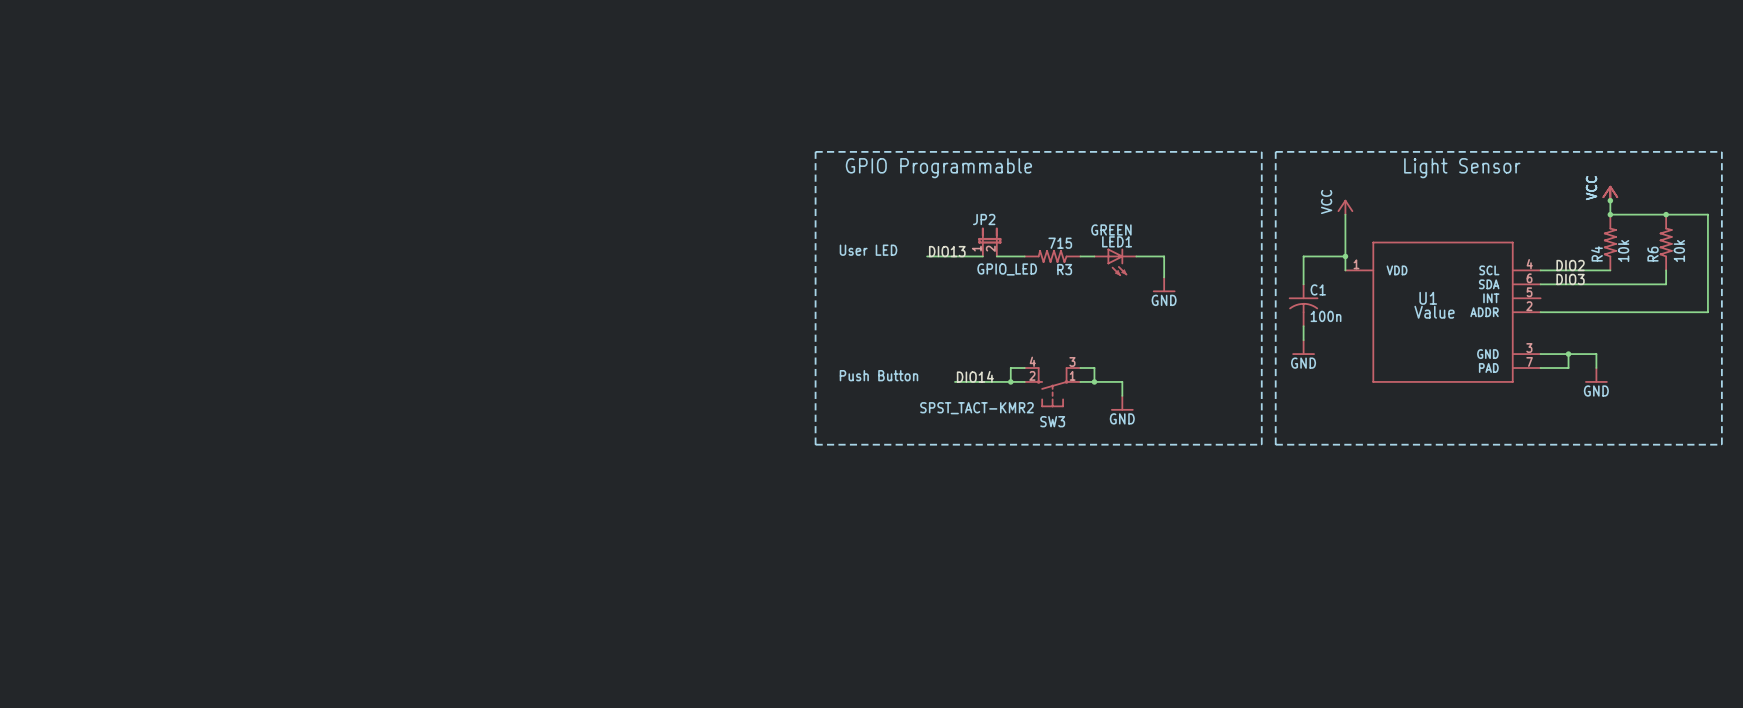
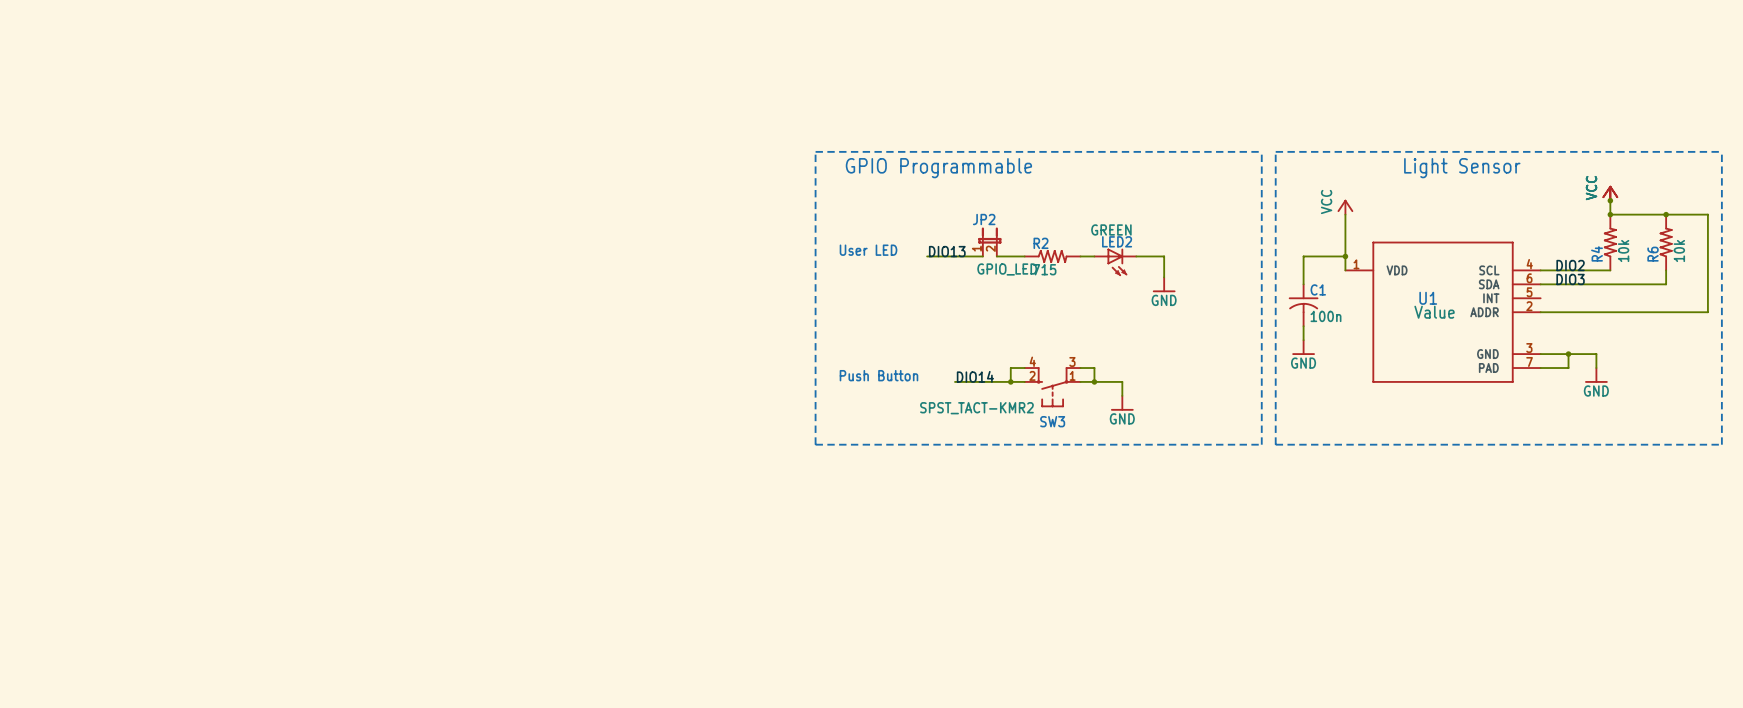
LED1 name: LED1 (1117, 241) -> LED2 (1117, 241)
R3: 715 (1052, 256) -> none
R2: none -> 715 (1052, 256)

